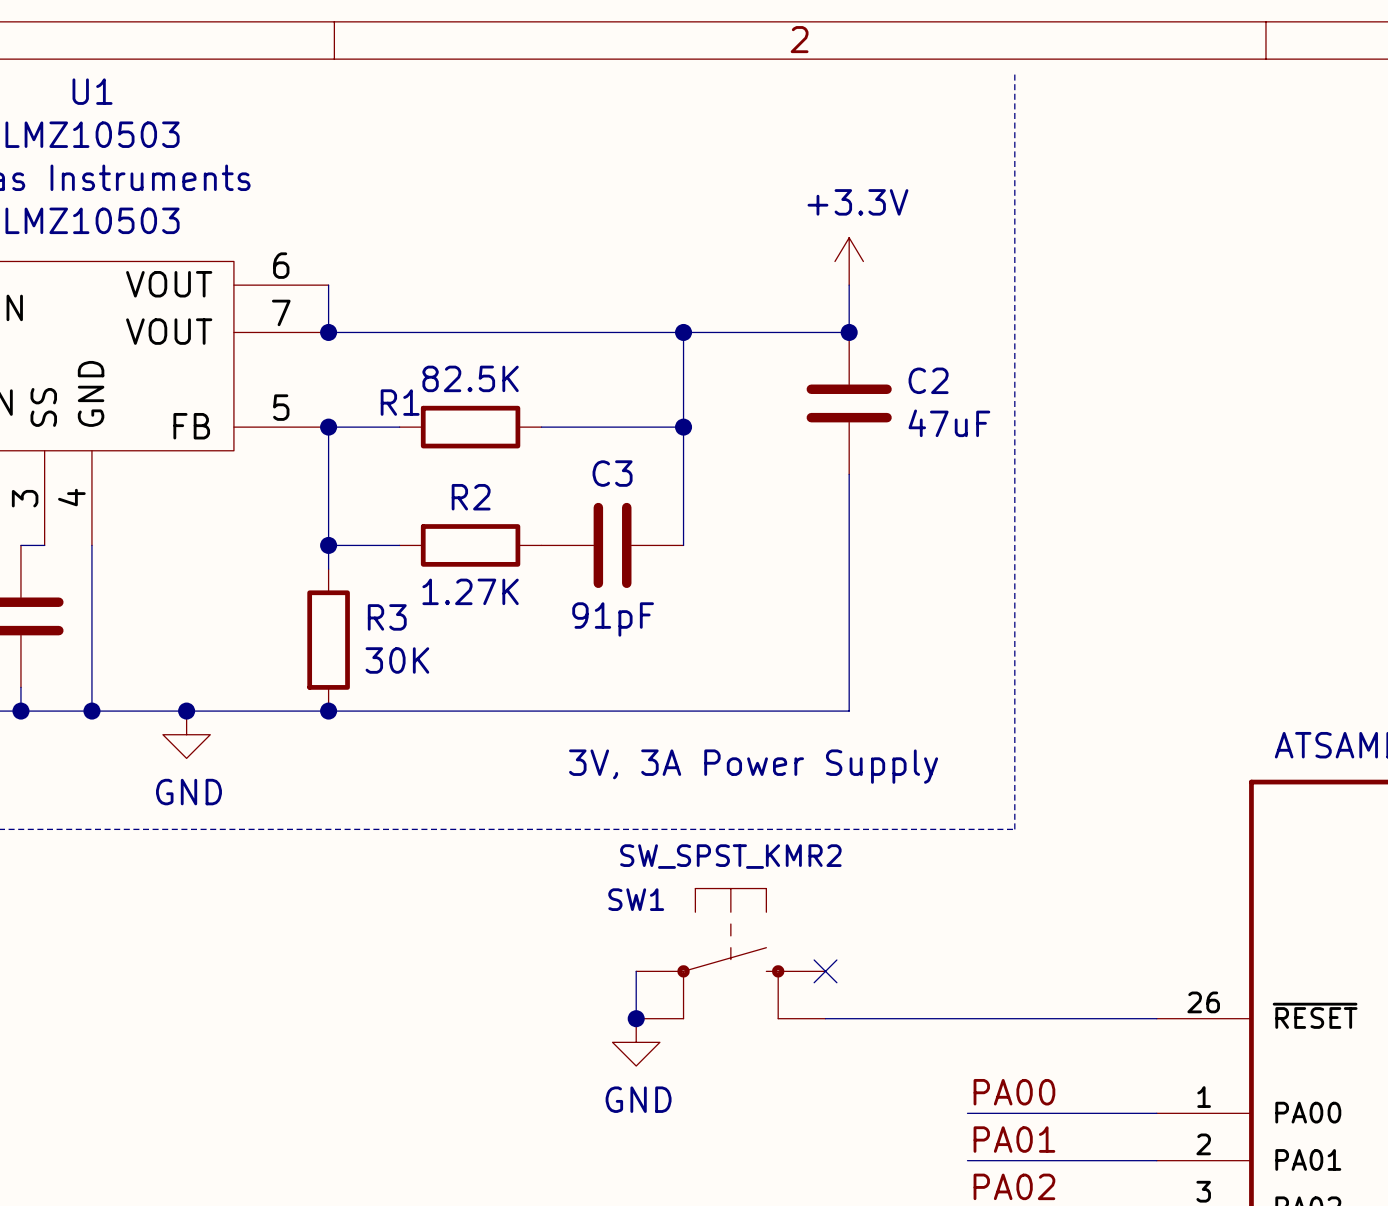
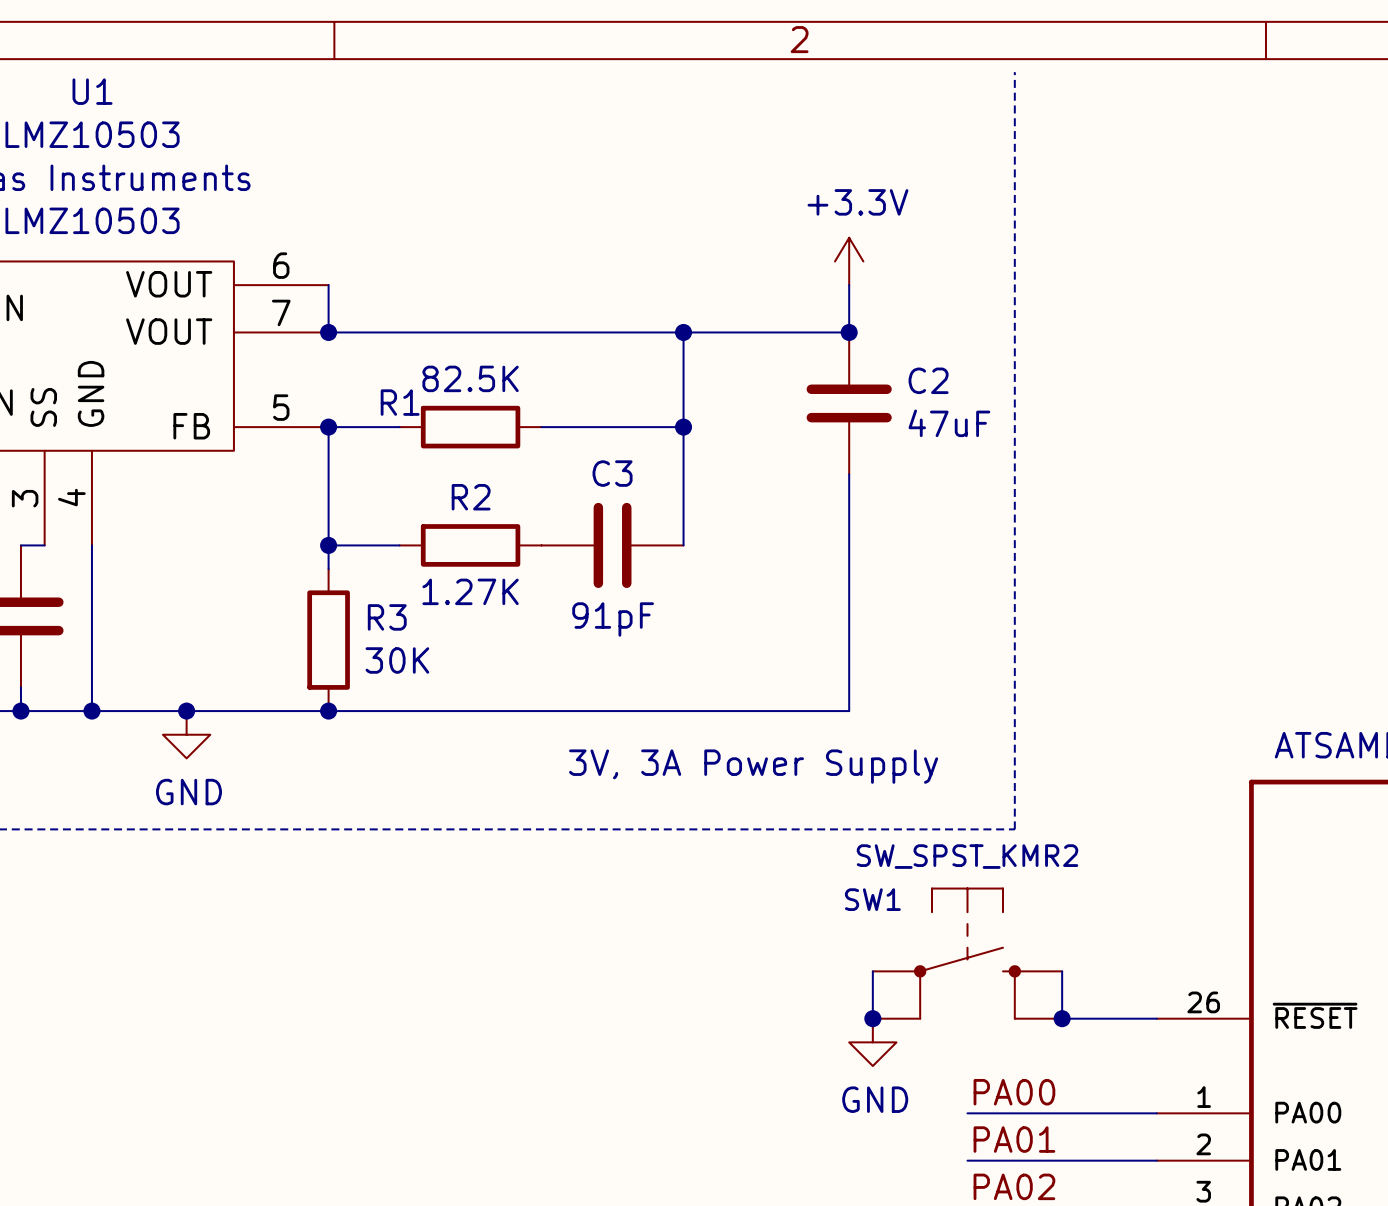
SW1 position: (730, 953) -> (967, 953)
wire: (636, 971) (636, 1018) -> (872, 971) (872, 1018)
no-connect mark: (825, 971) -> none
junction: (636, 1018) -> none
wire: (825, 1018) (1062, 1018) -> (1062, 971) (1062, 1018)
junction: none -> (872, 1018)
junction: none -> (1062, 1018)
power symbol position: GND (636, 1042) -> GND (872, 1042)

